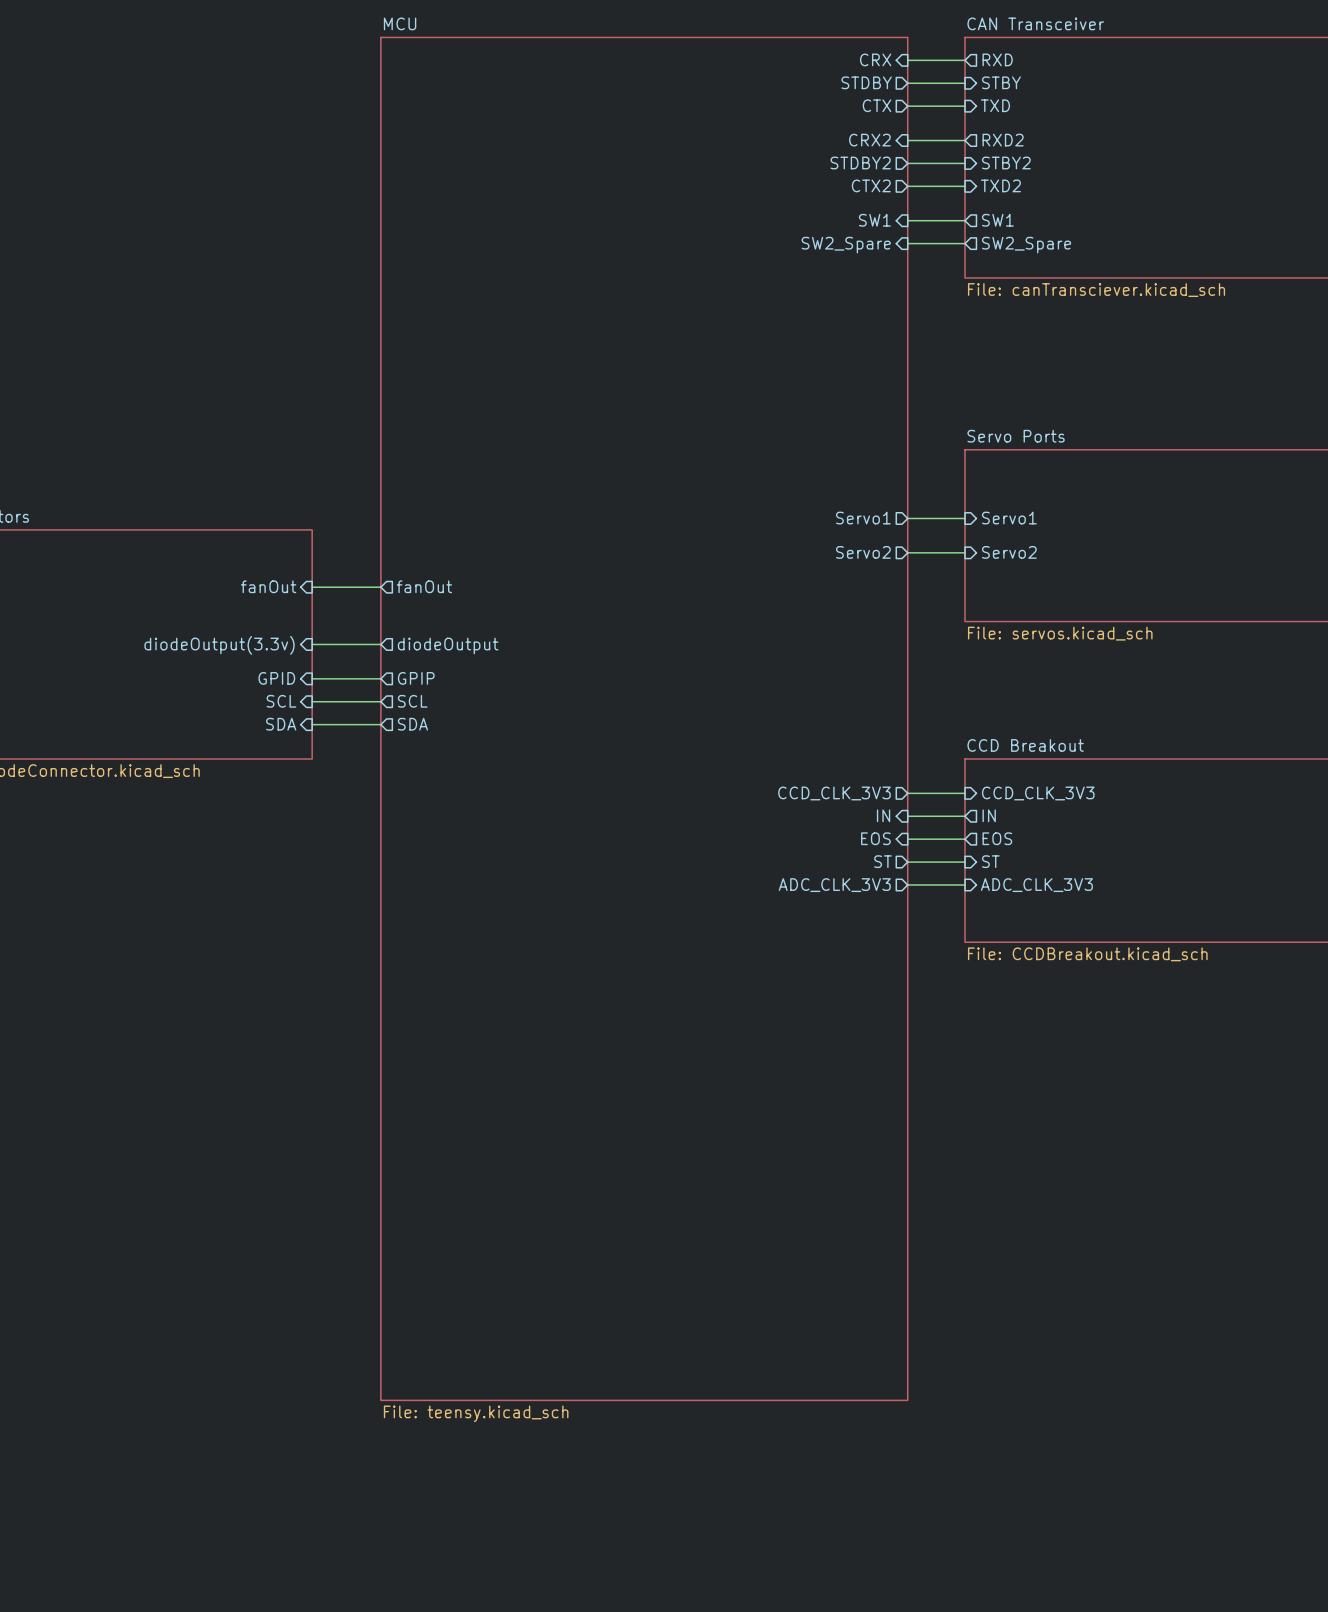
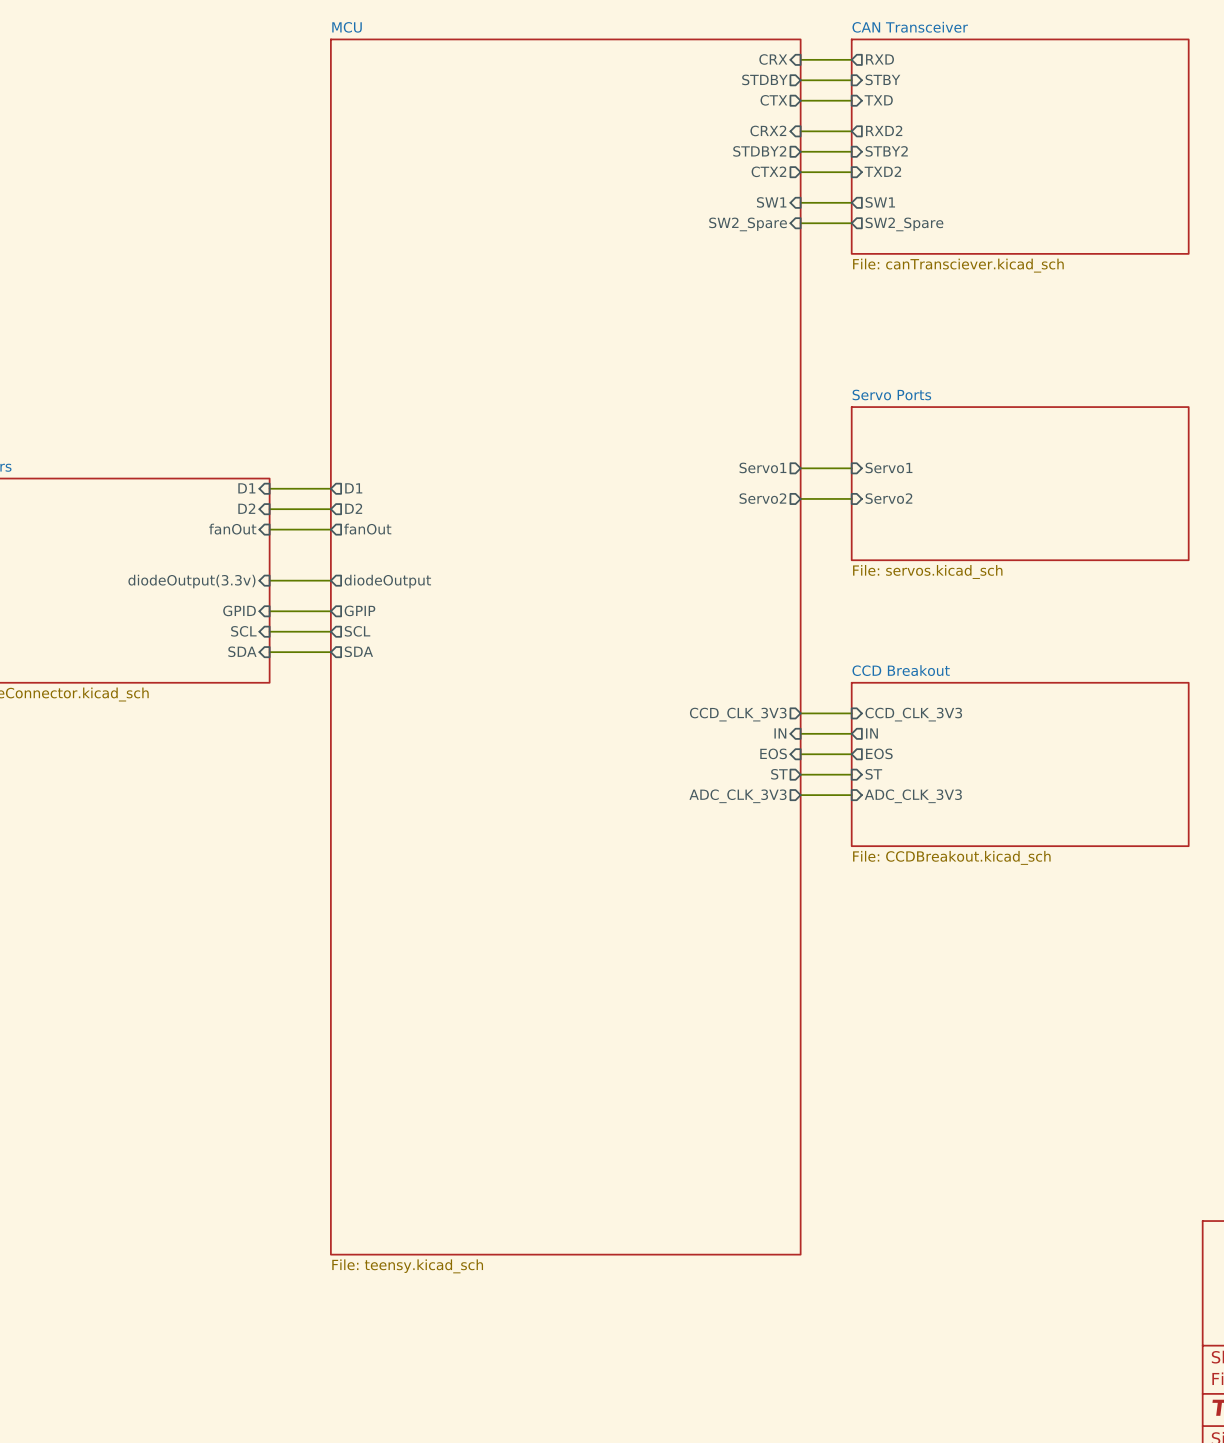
sheet pin: none -> D1 (246, 488)
sheet pin: none -> D1 (353, 488)
wire: none -> (269, 488) (330, 488)
sheet pin: none -> D2 (246, 508)
sheet pin: none -> D2 (353, 508)
wire: none -> (269, 509) (330, 509)

